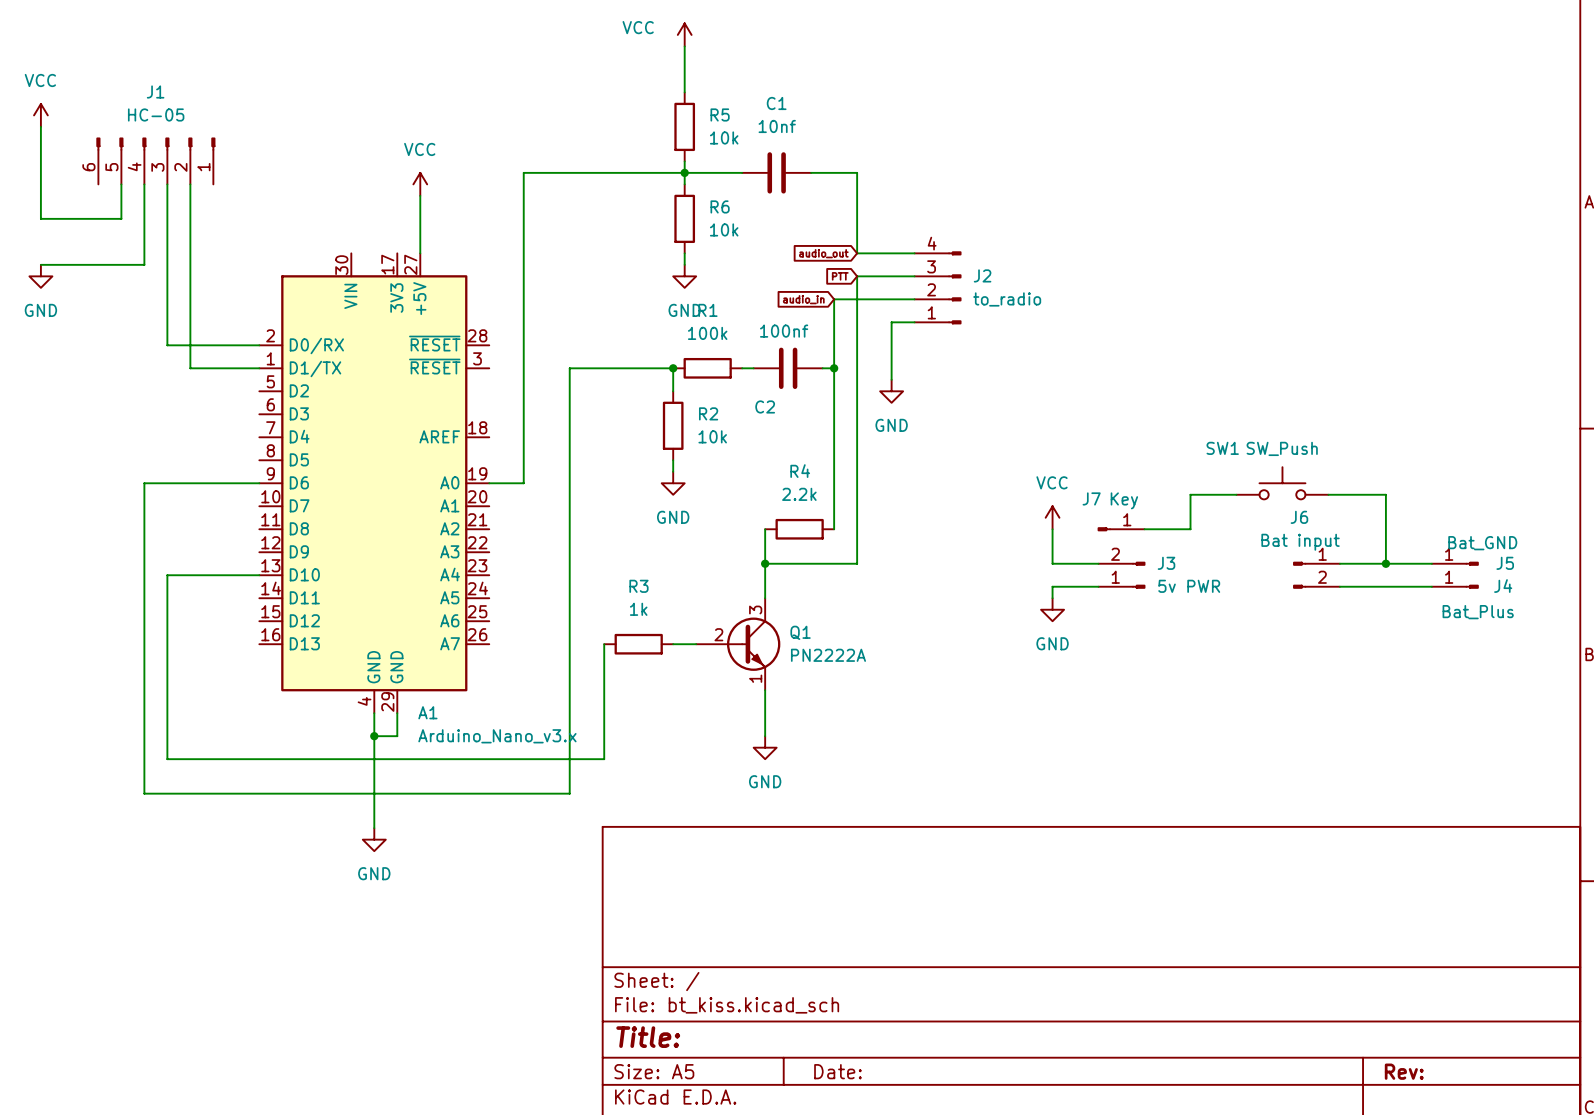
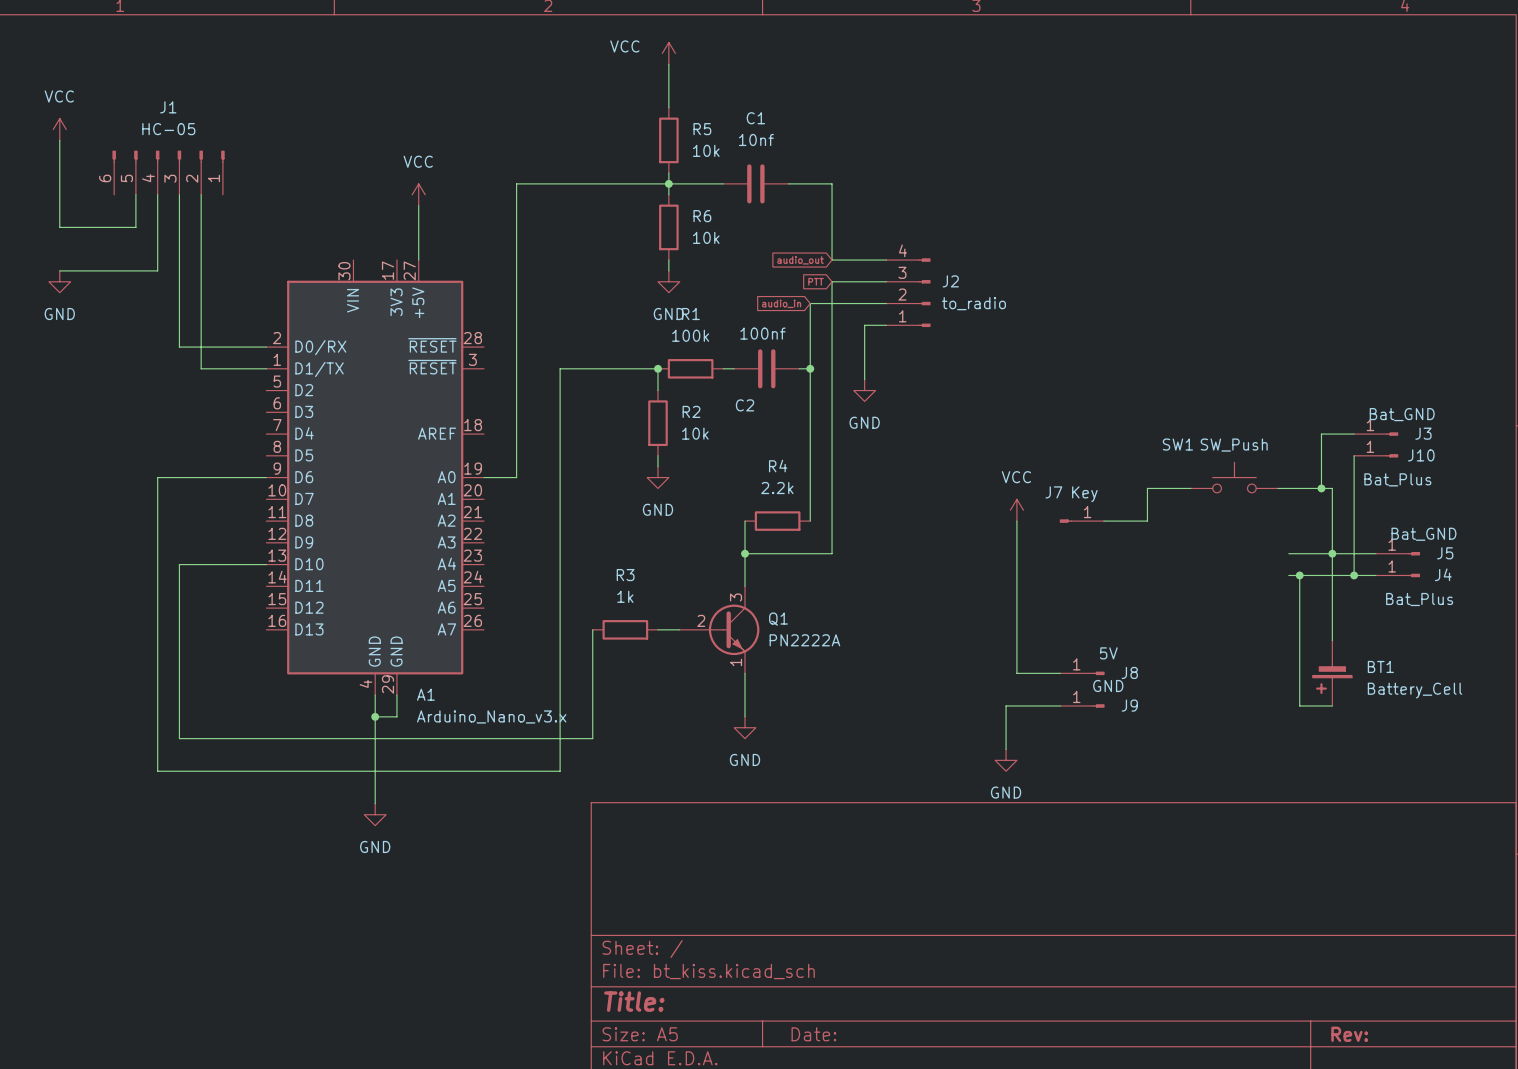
wire: none -> (1354, 434) (1321, 434) (1321, 488)
wire: none -> (1354, 455) (1354, 575)
J10: none -> Bat_Plus (1376, 455)
junction: none -> (1321, 488)
J3 symbol: [1098, 561, 1146, 589] -> [1354, 432, 1399, 436]
wire: (1052, 563) (1098, 563) -> (1016, 553) (1016, 575)
wire: none -> (1332, 553) (1332, 640)
J6: Bat input (1316, 575) -> none
wire: (1052, 586) (1098, 586) -> none
J3 value: 5v PWR (1189, 586) -> Bat_GND (1402, 414)
wire: none -> (1299, 575) (1299, 705) (1332, 705)
junction: none -> (1299, 575)
junction: none -> (1354, 575)
wire: none -> (1016, 586) (1016, 673) (1060, 673)
power symbol position: GND (1052, 609) -> GND (1006, 760)
J8: none -> 5V (1082, 673)
BT1: none -> Battery_Cell (1332, 673)
wire: none -> (1060, 705) (1006, 705) (1006, 749)
J9: none -> GND (1082, 705)

